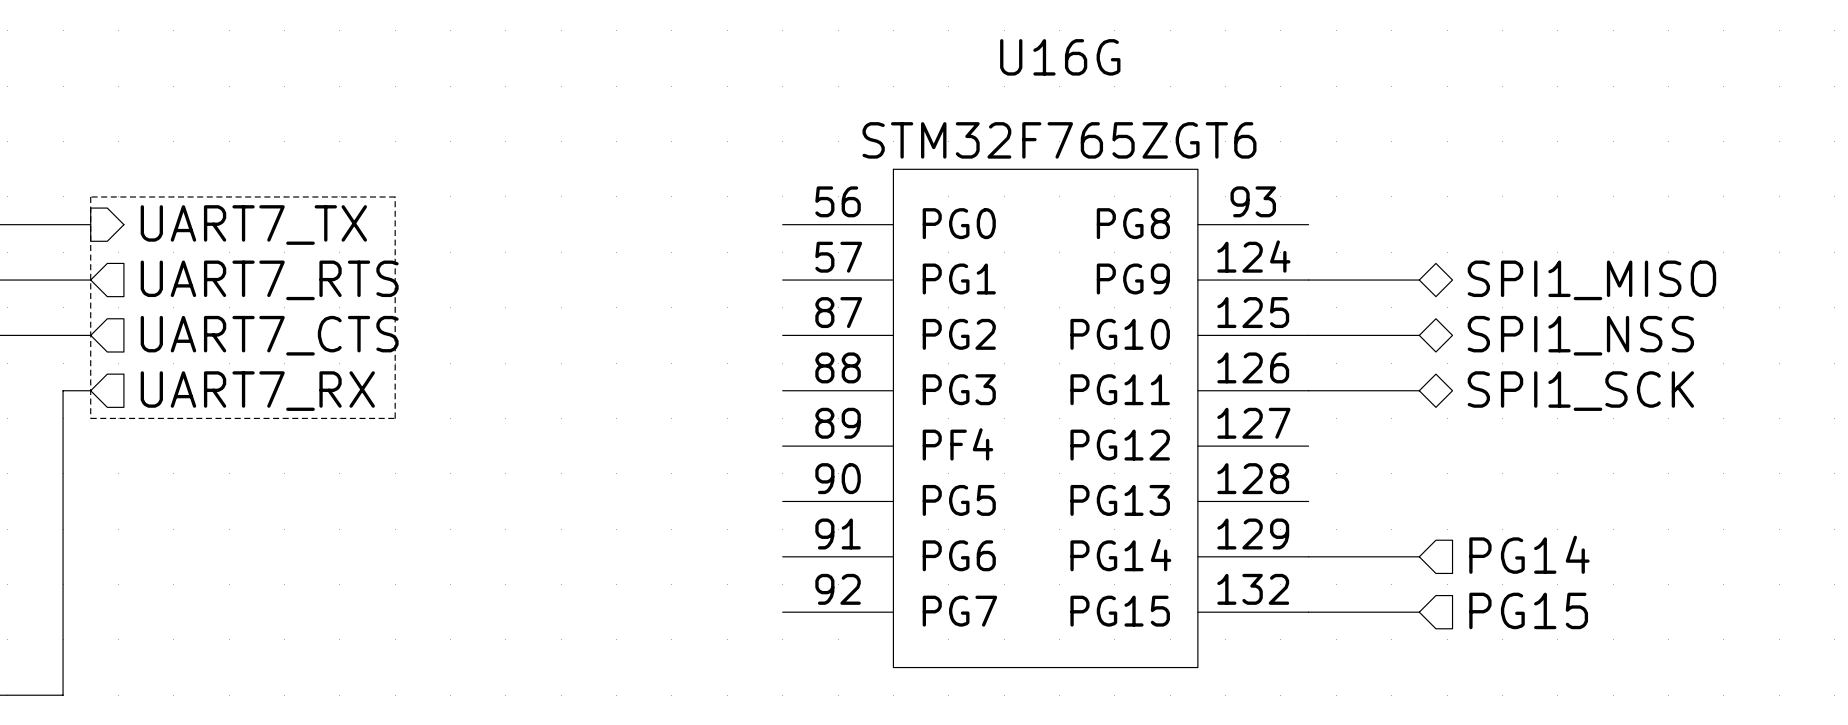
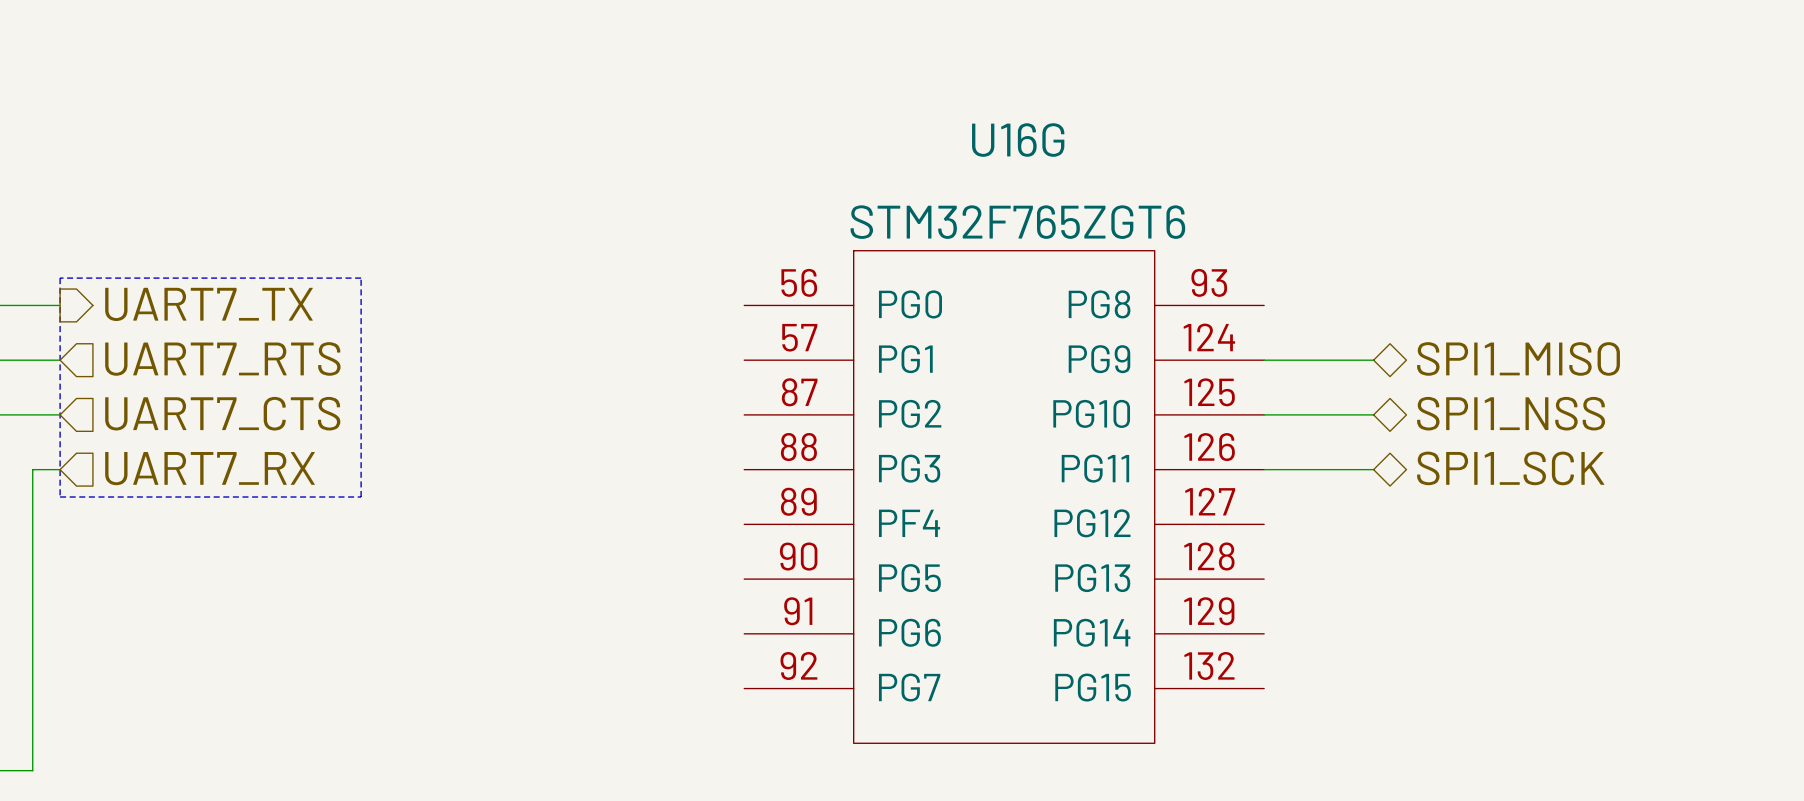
hierarchical label: PG14 (1529, 554) -> none
wire: (1308, 556) (1419, 556) -> none
hierarchical label: PG15 (1528, 610) -> none
wire: (1308, 612) (1419, 612) -> none

